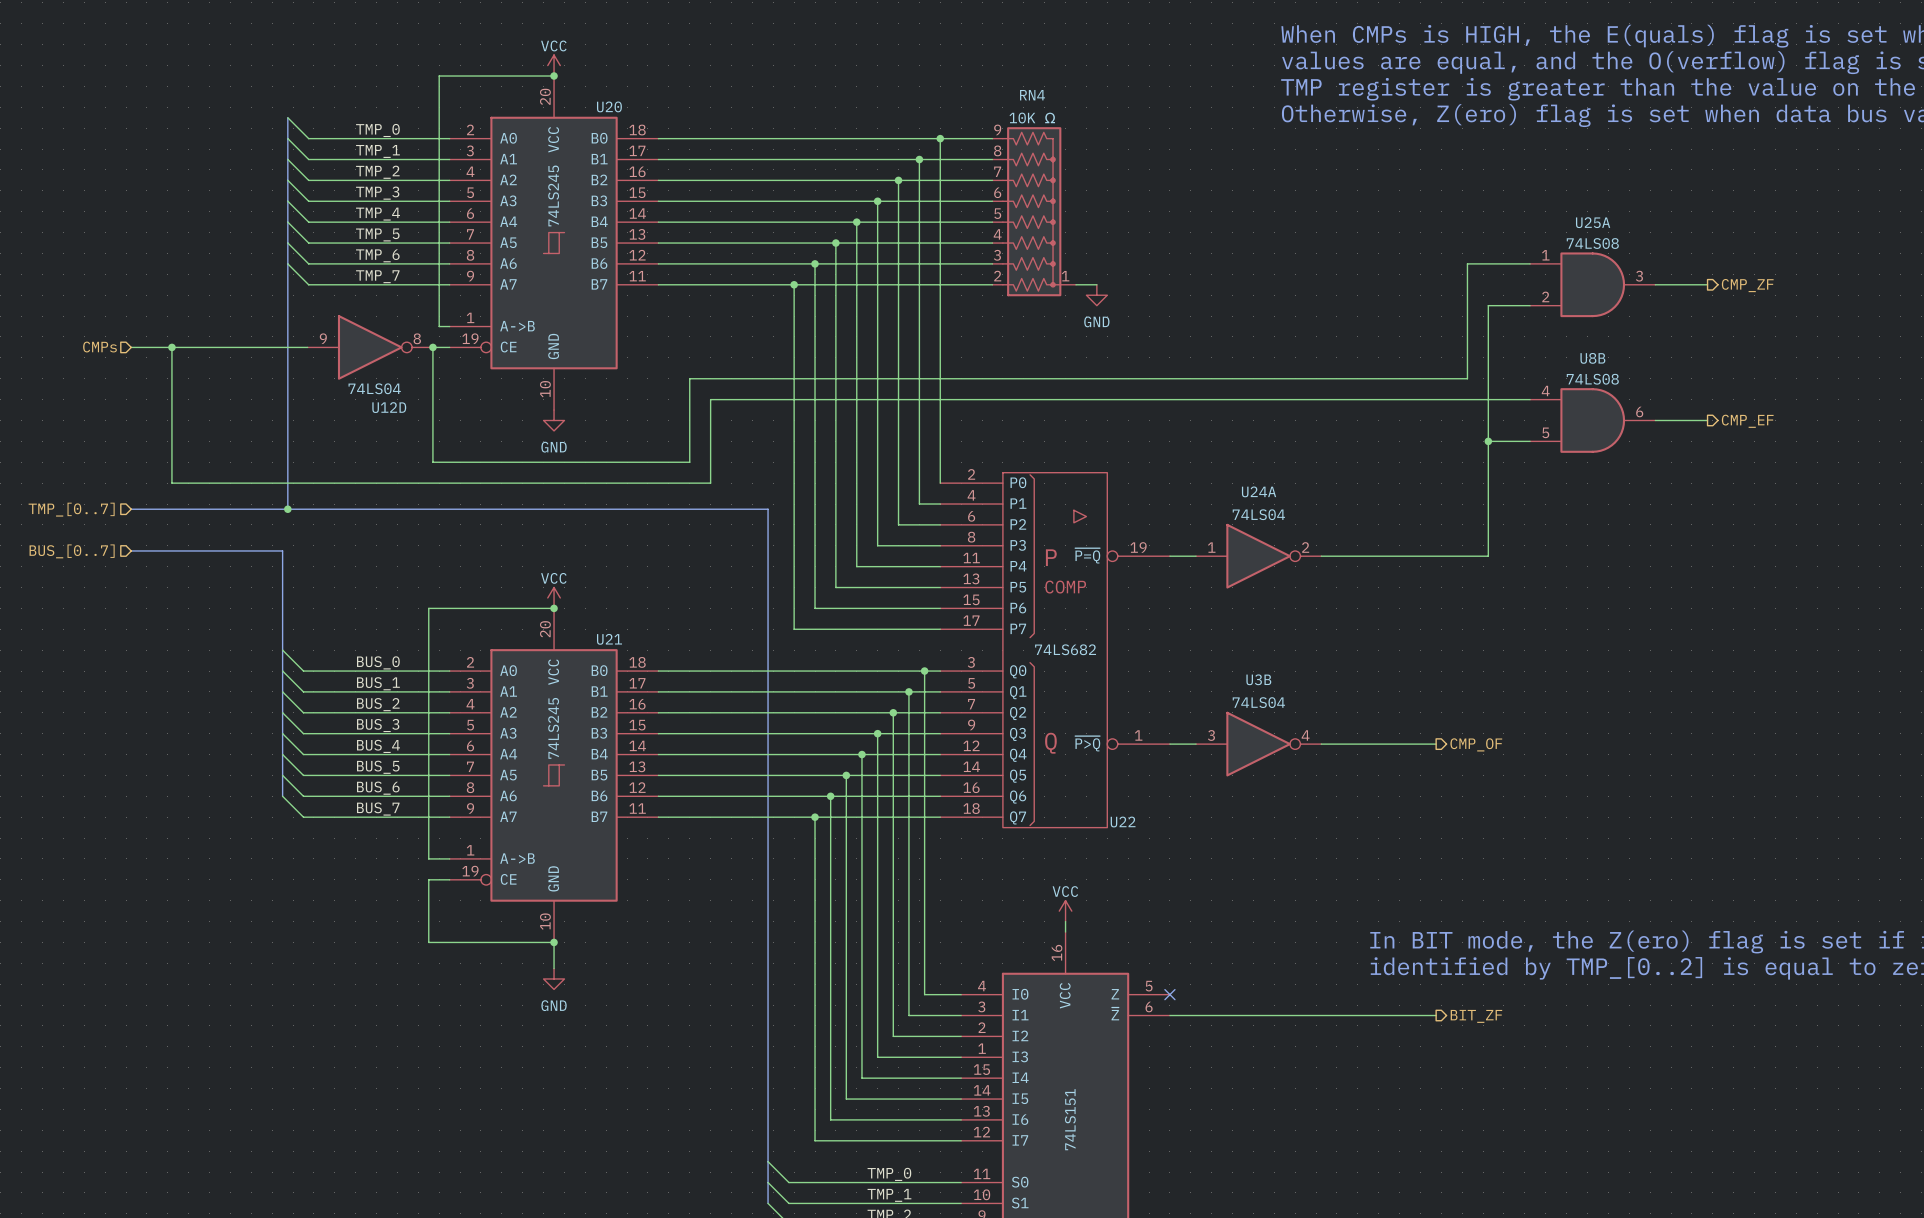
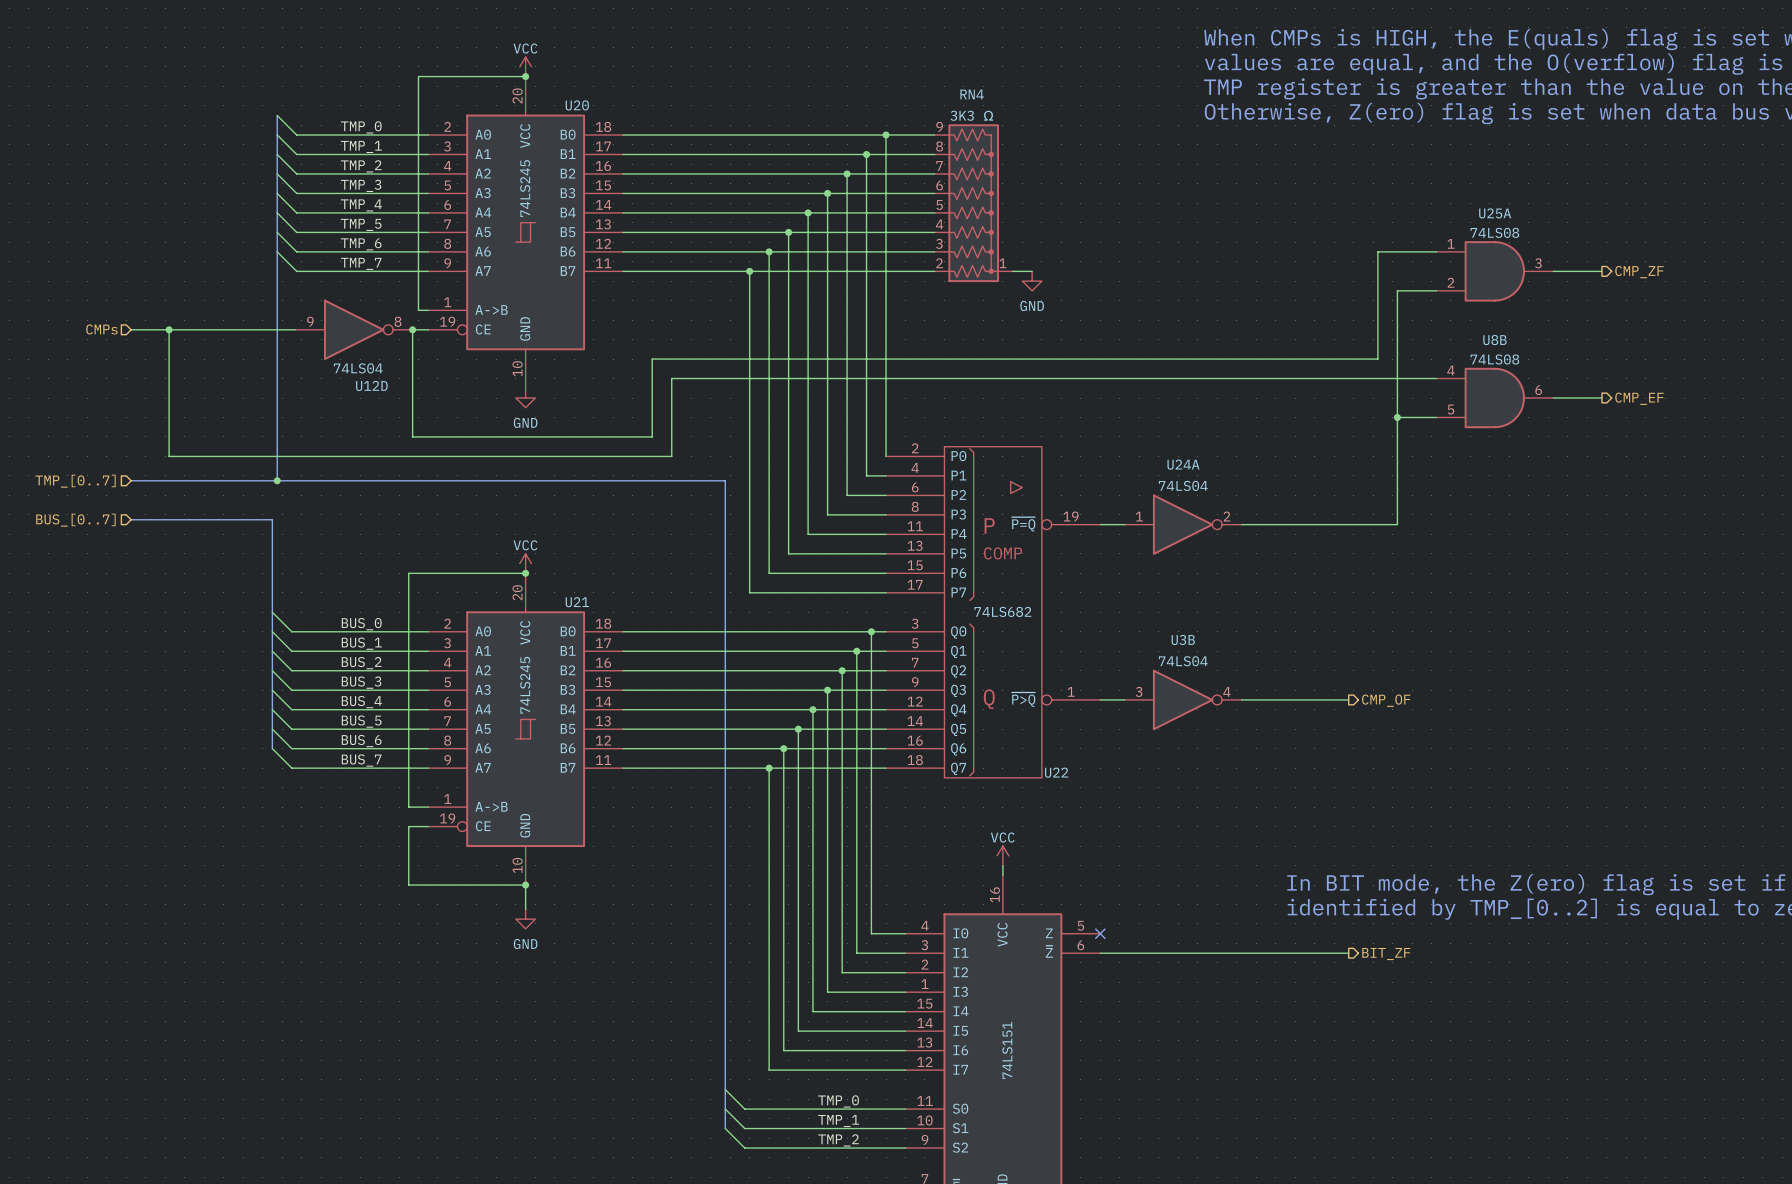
RN4 value: 10K Ω (1032, 118) -> 3K3 Ω (971, 115)

